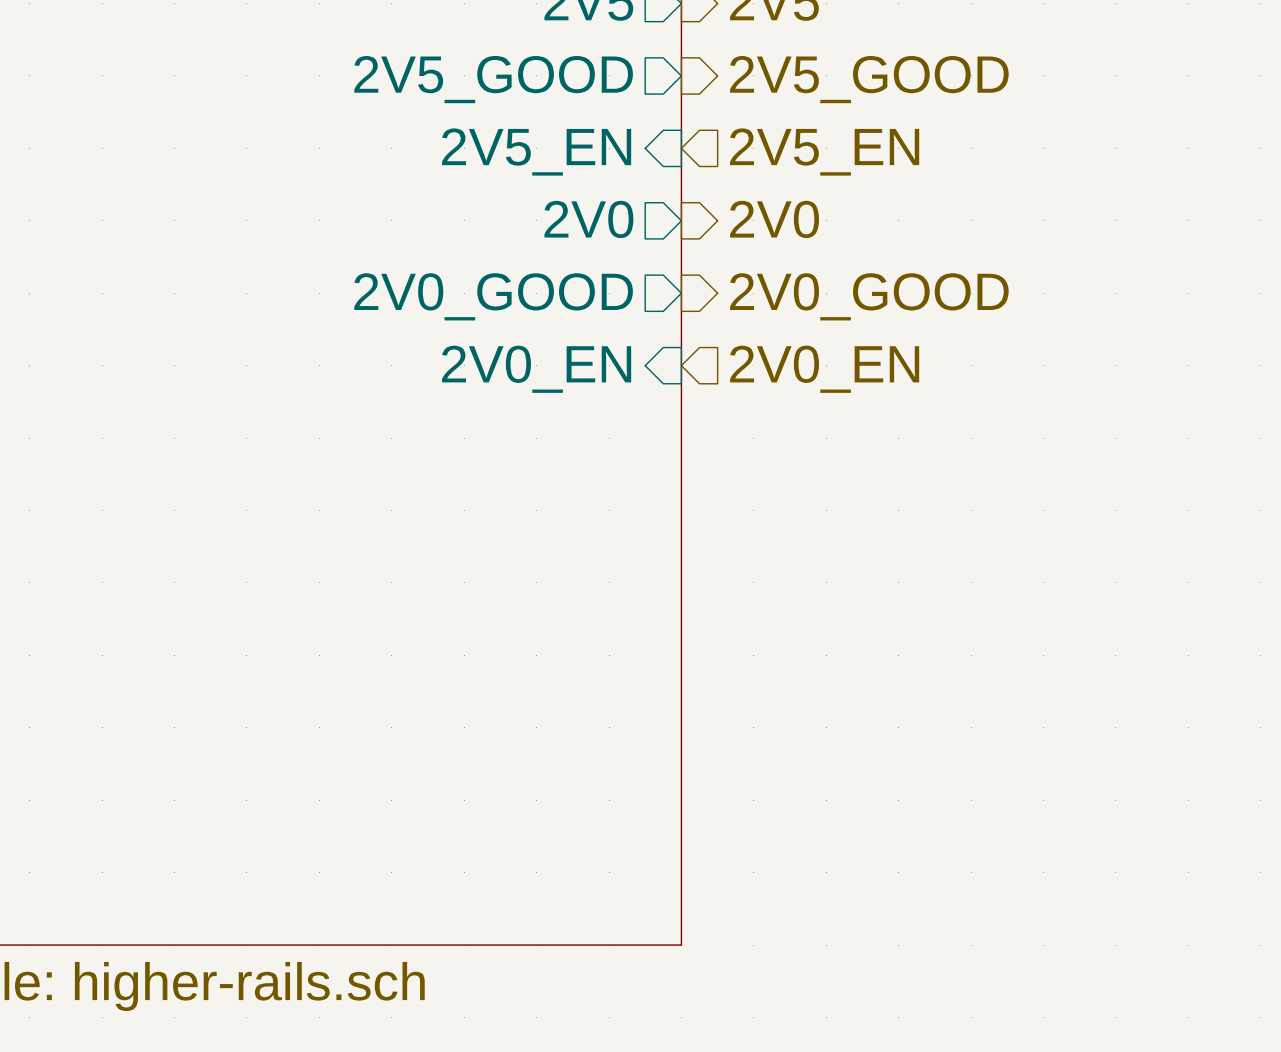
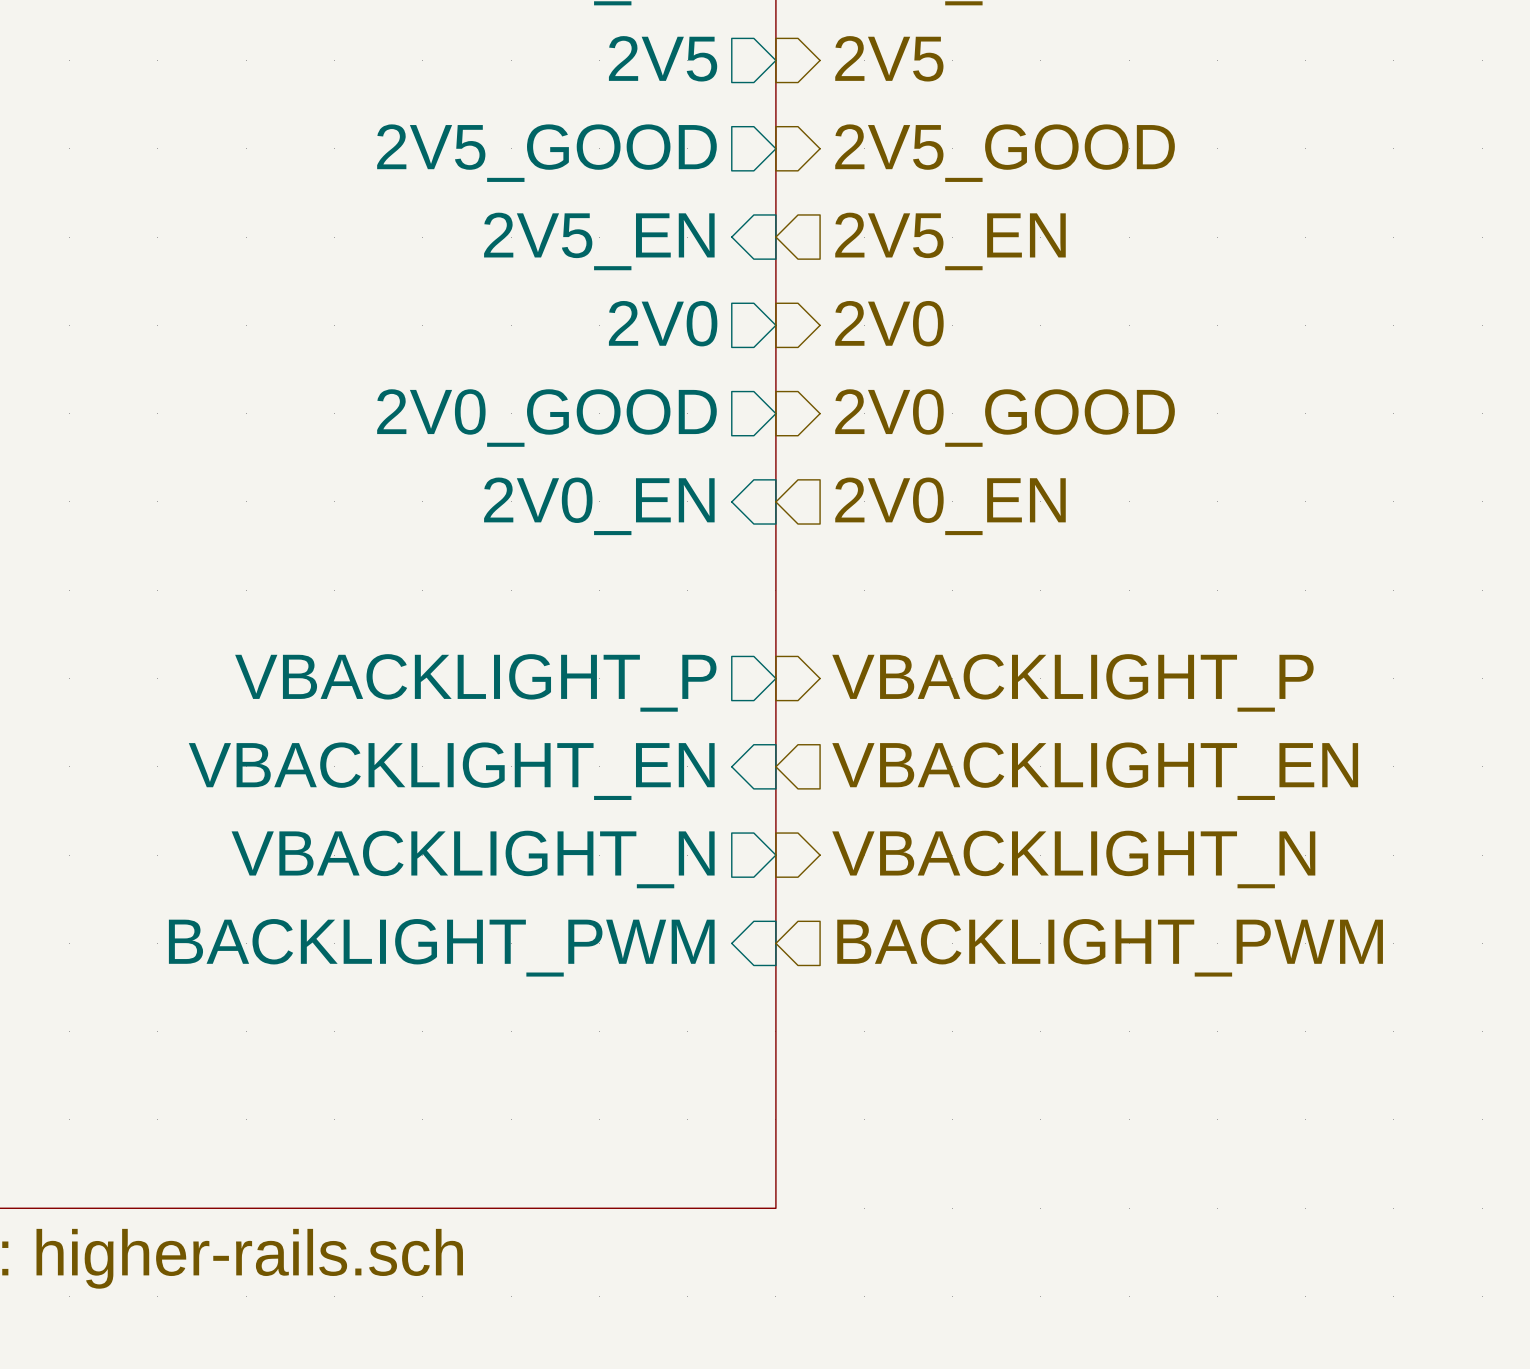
sheet pin: none -> VBACKLIGHT_P (475, 682)
hierarchical label: none -> VBACKLIGHT_P (1072, 682)
sheet pin: none -> VBACKLIGHT_EN (451, 771)
hierarchical label: none -> VBACKLIGHT_EN (1095, 771)
sheet pin: none -> VBACKLIGHT_N (473, 859)
hierarchical label: none -> VBACKLIGHT_N (1073, 859)
sheet pin: none -> BACKLIGHT_PWM (441, 947)
hierarchical label: none -> BACKLIGHT_PWM (1110, 947)

